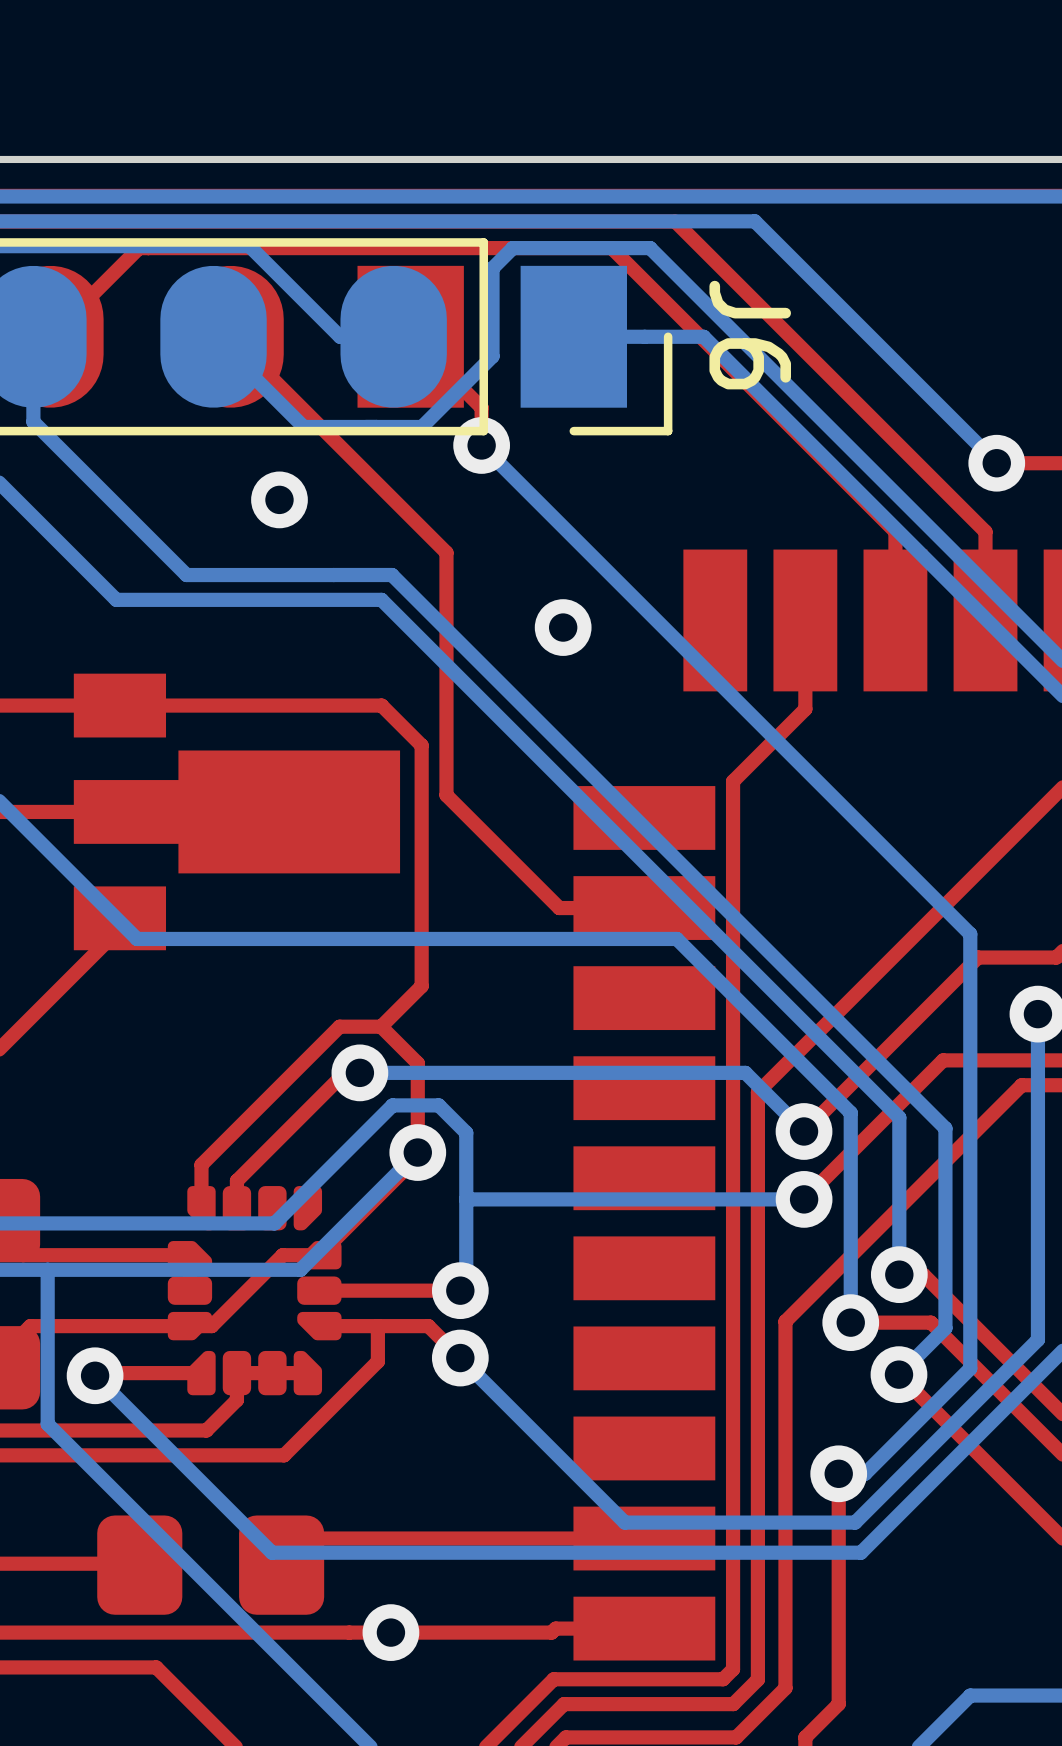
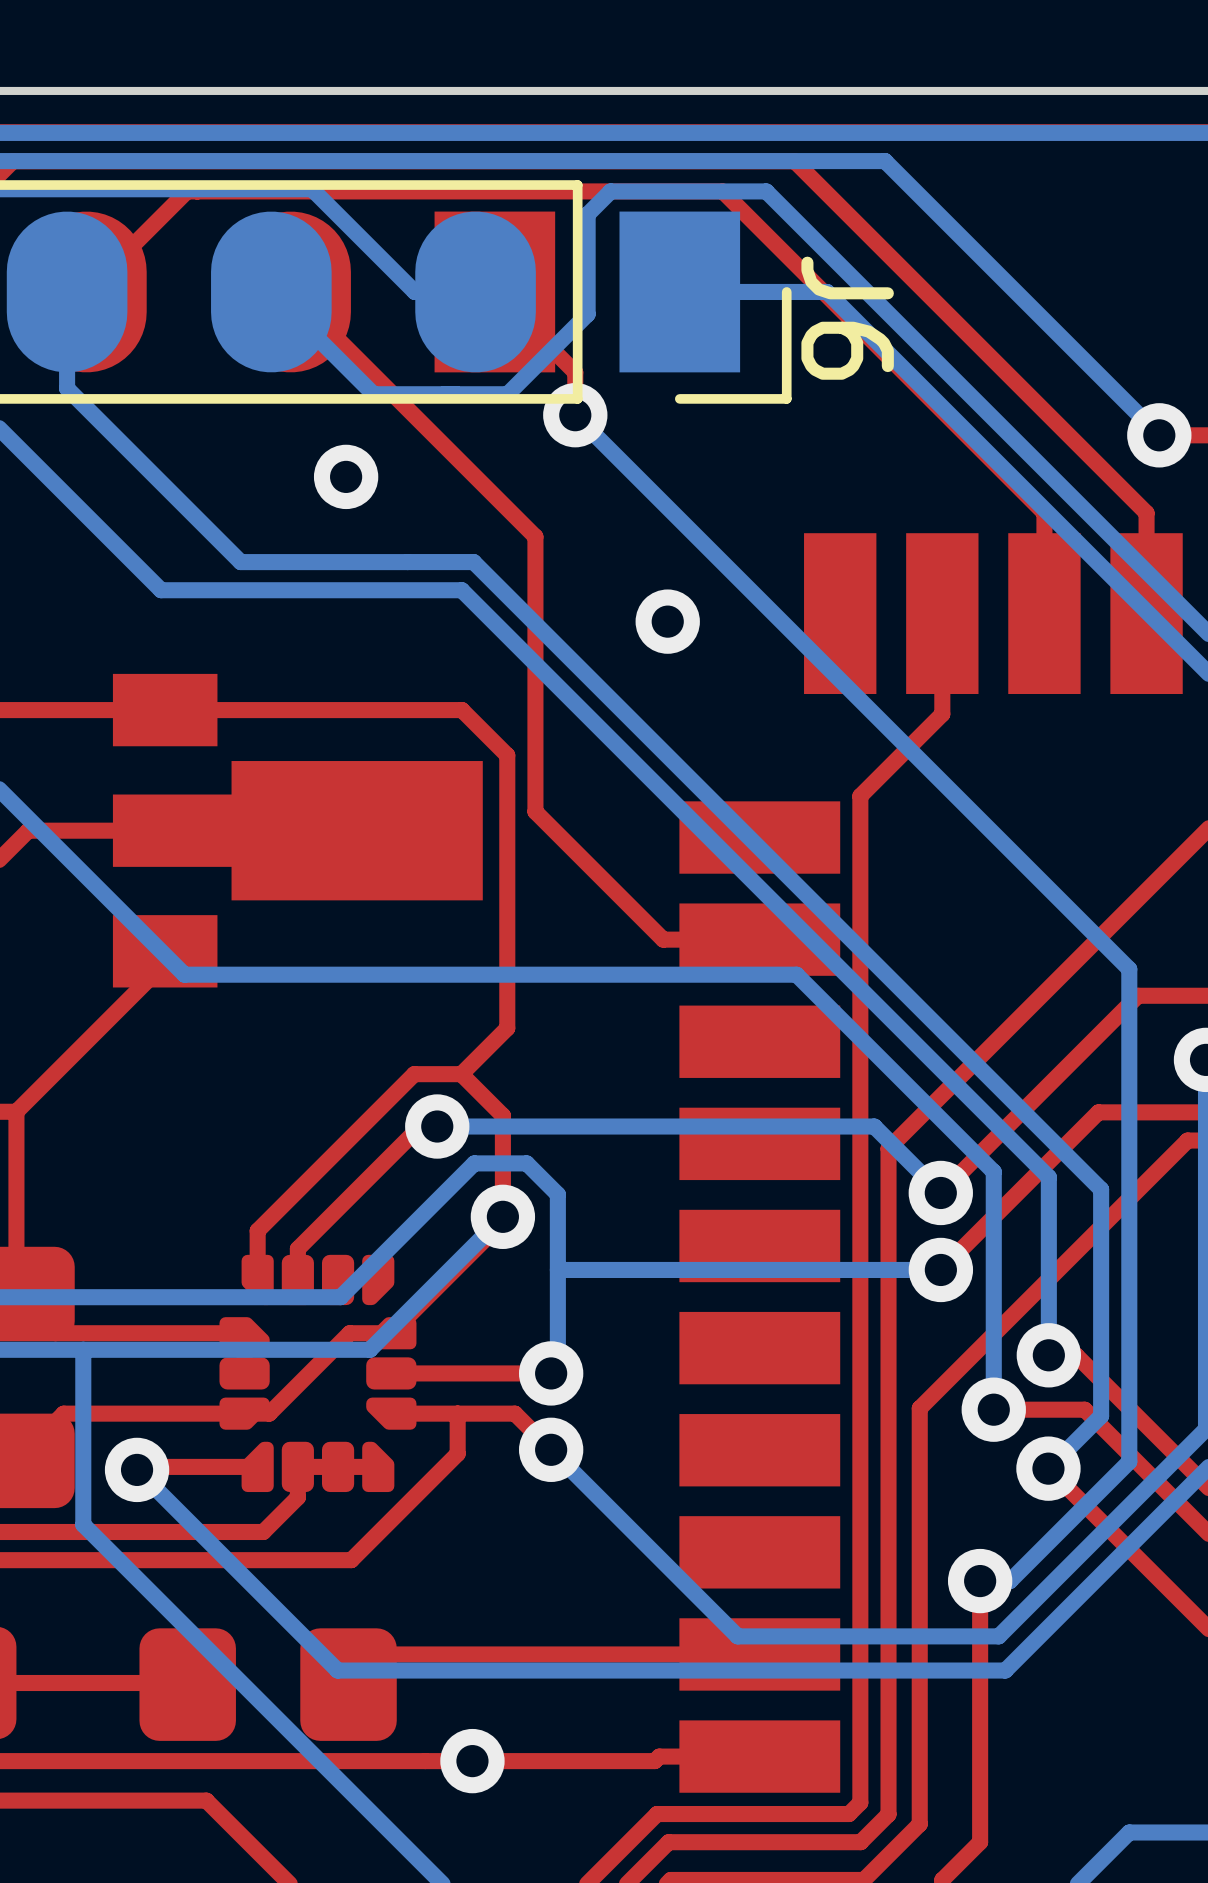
J6 name position: J6 (750, 335) -> J6 (847, 318)

